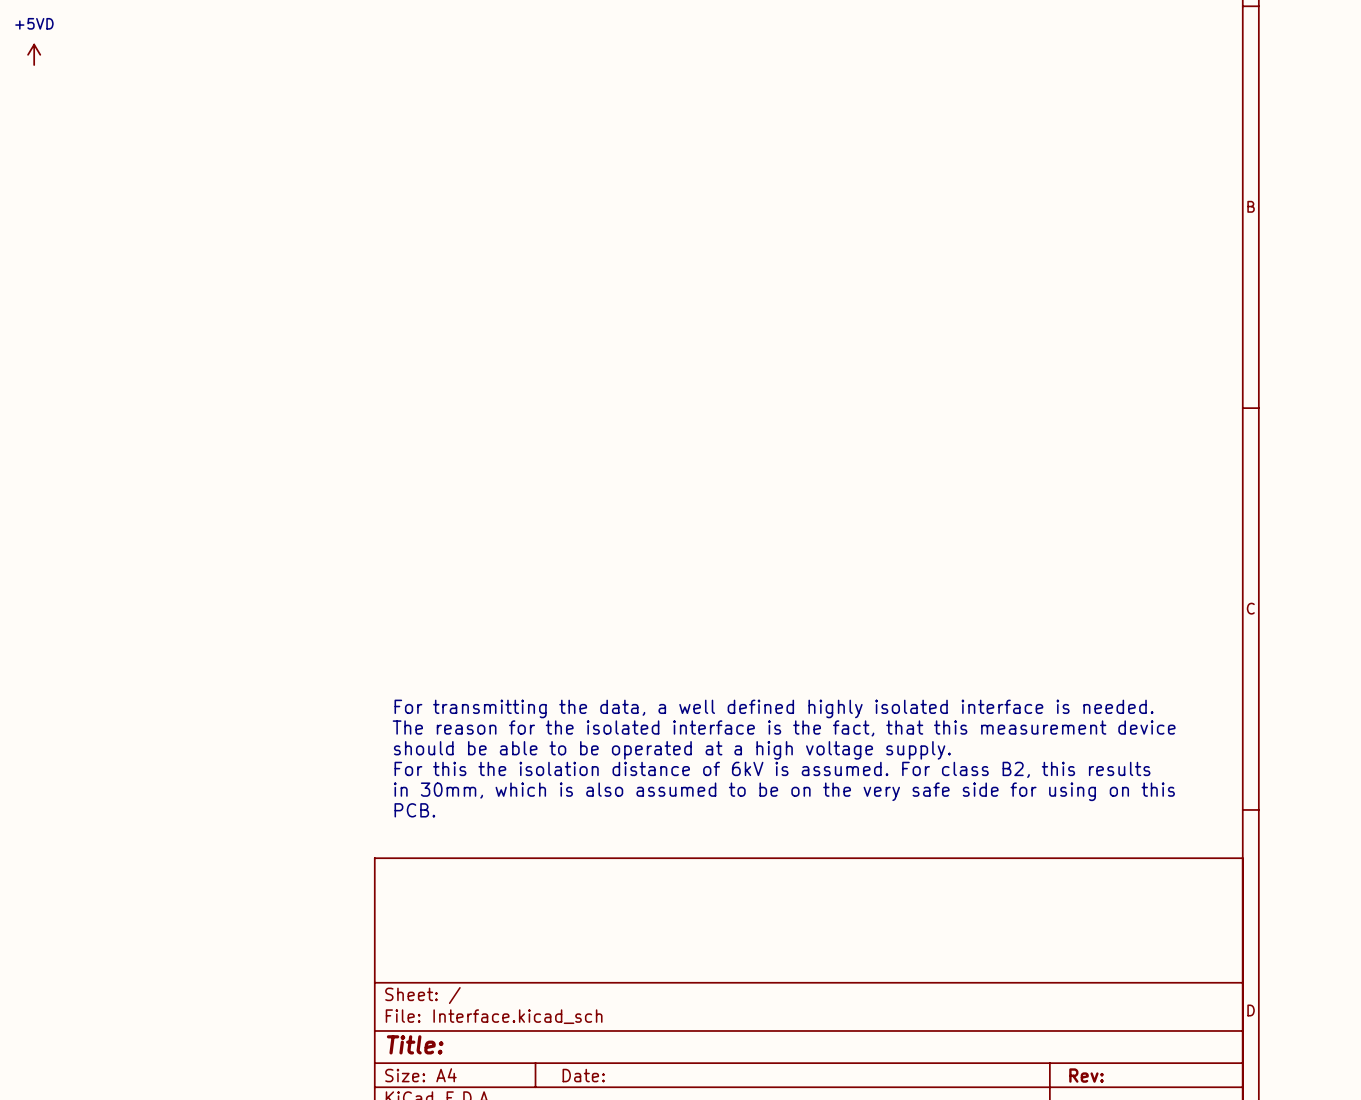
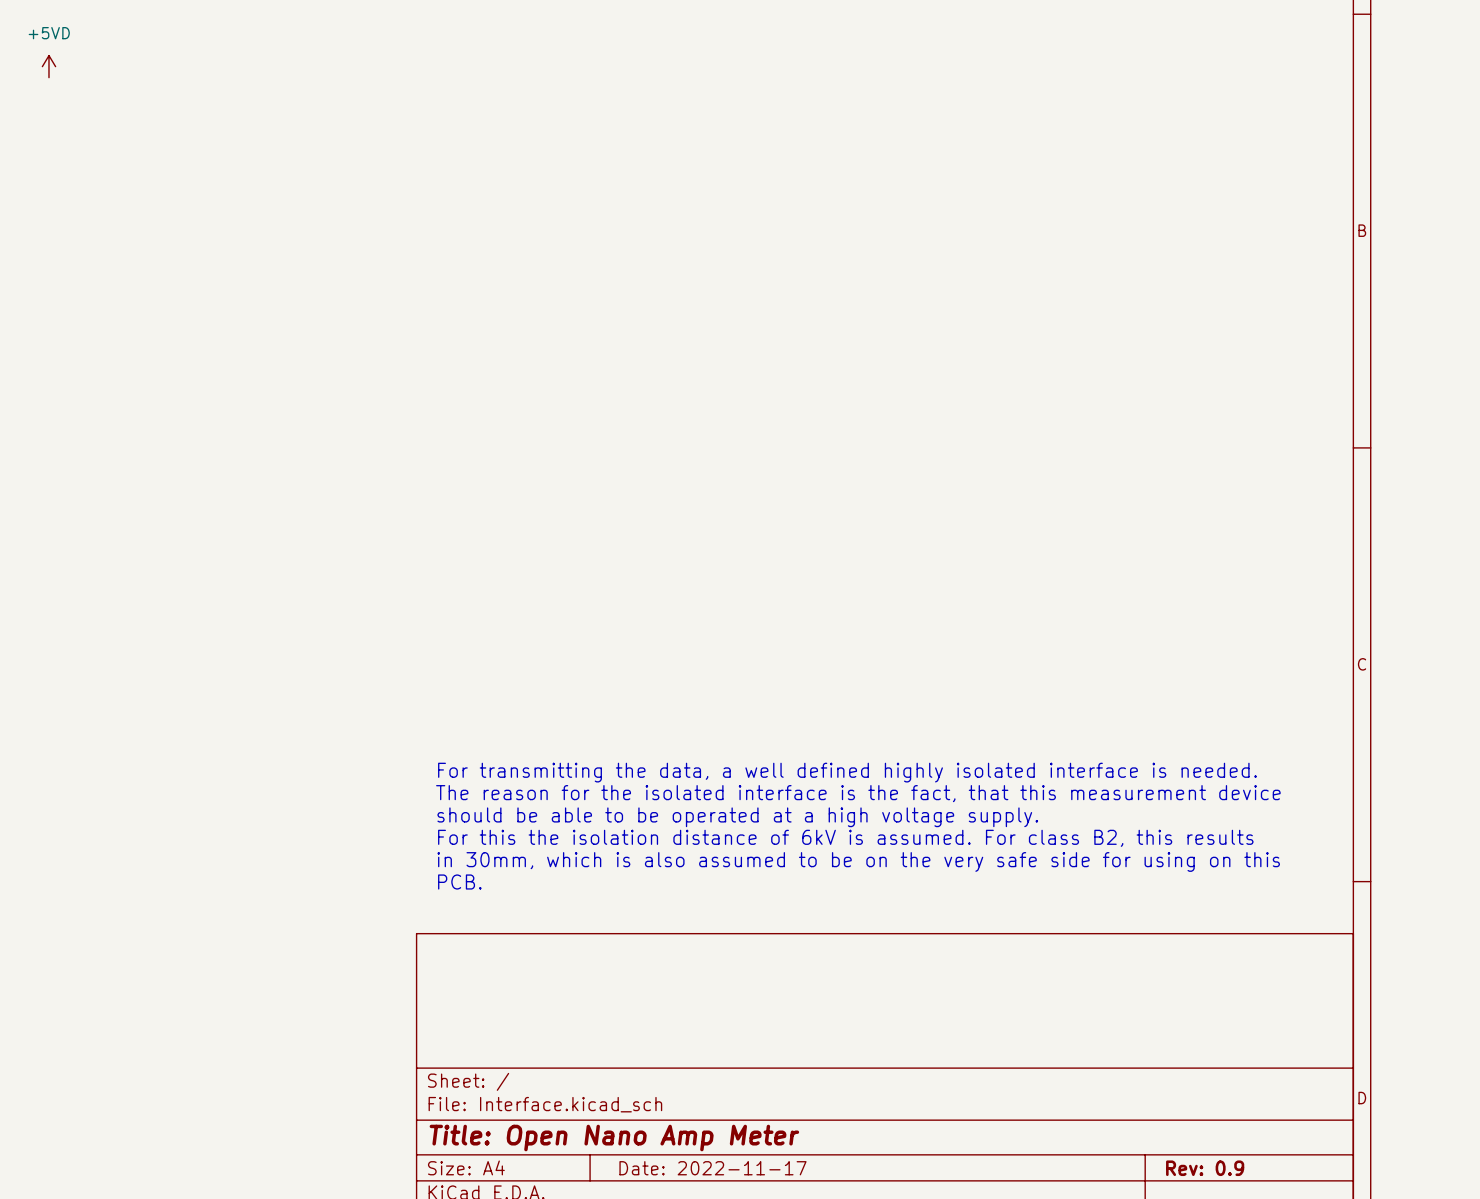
title block: Title: (415, 1044) -> Title: Open Nano Amp Meter (614, 1138)
title block: Date: (583, 1075) -> Date: 2022-11-17 (712, 1168)
title block: Rev: (1086, 1075) -> Rev: 0.9 (1205, 1168)

